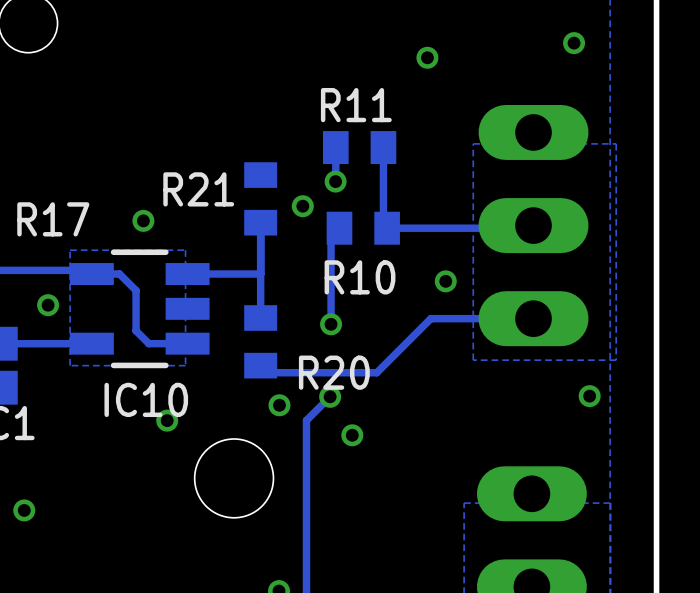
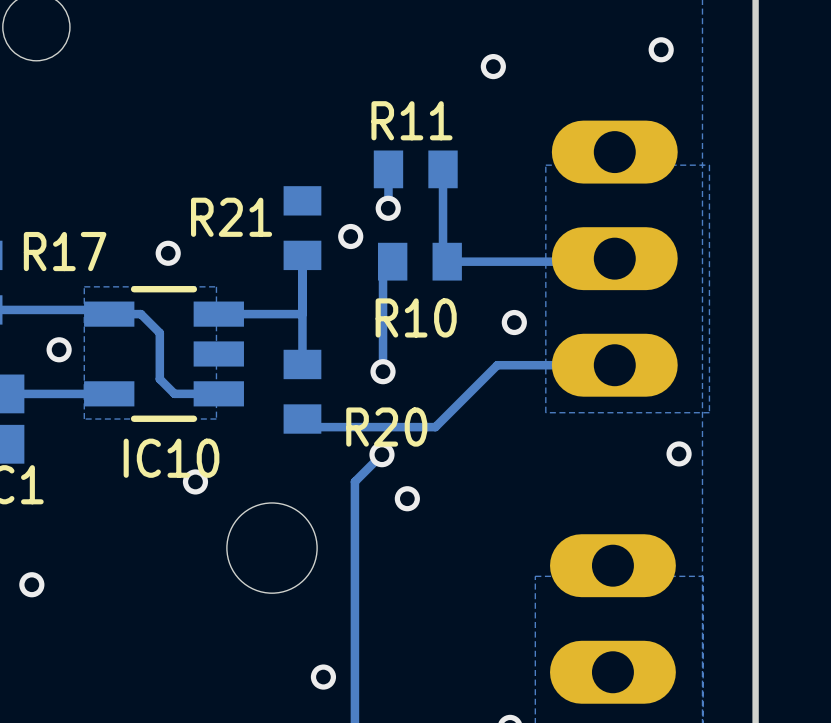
via: (279, 405) -> none

